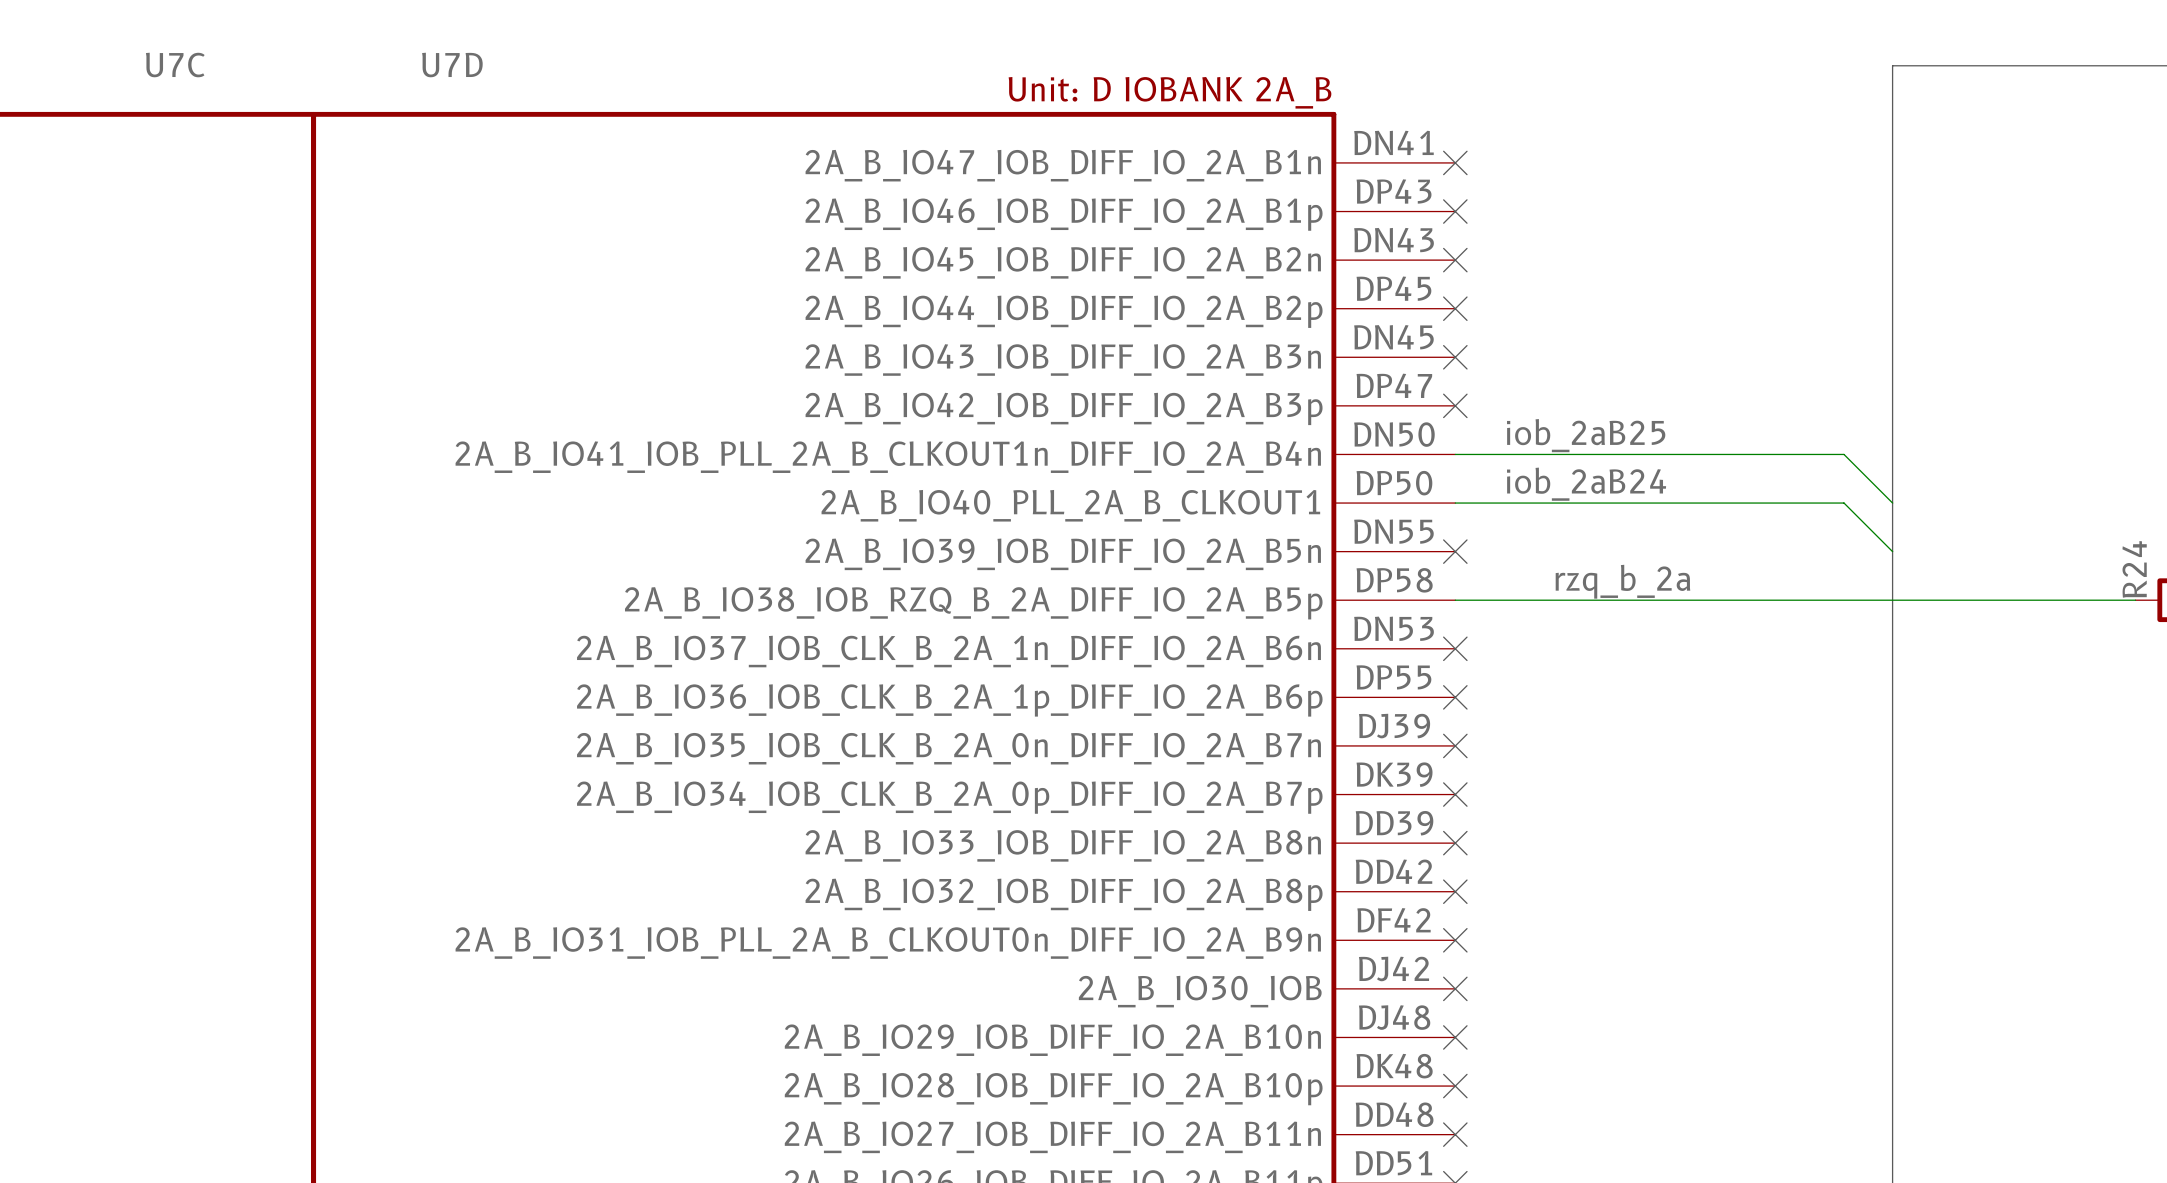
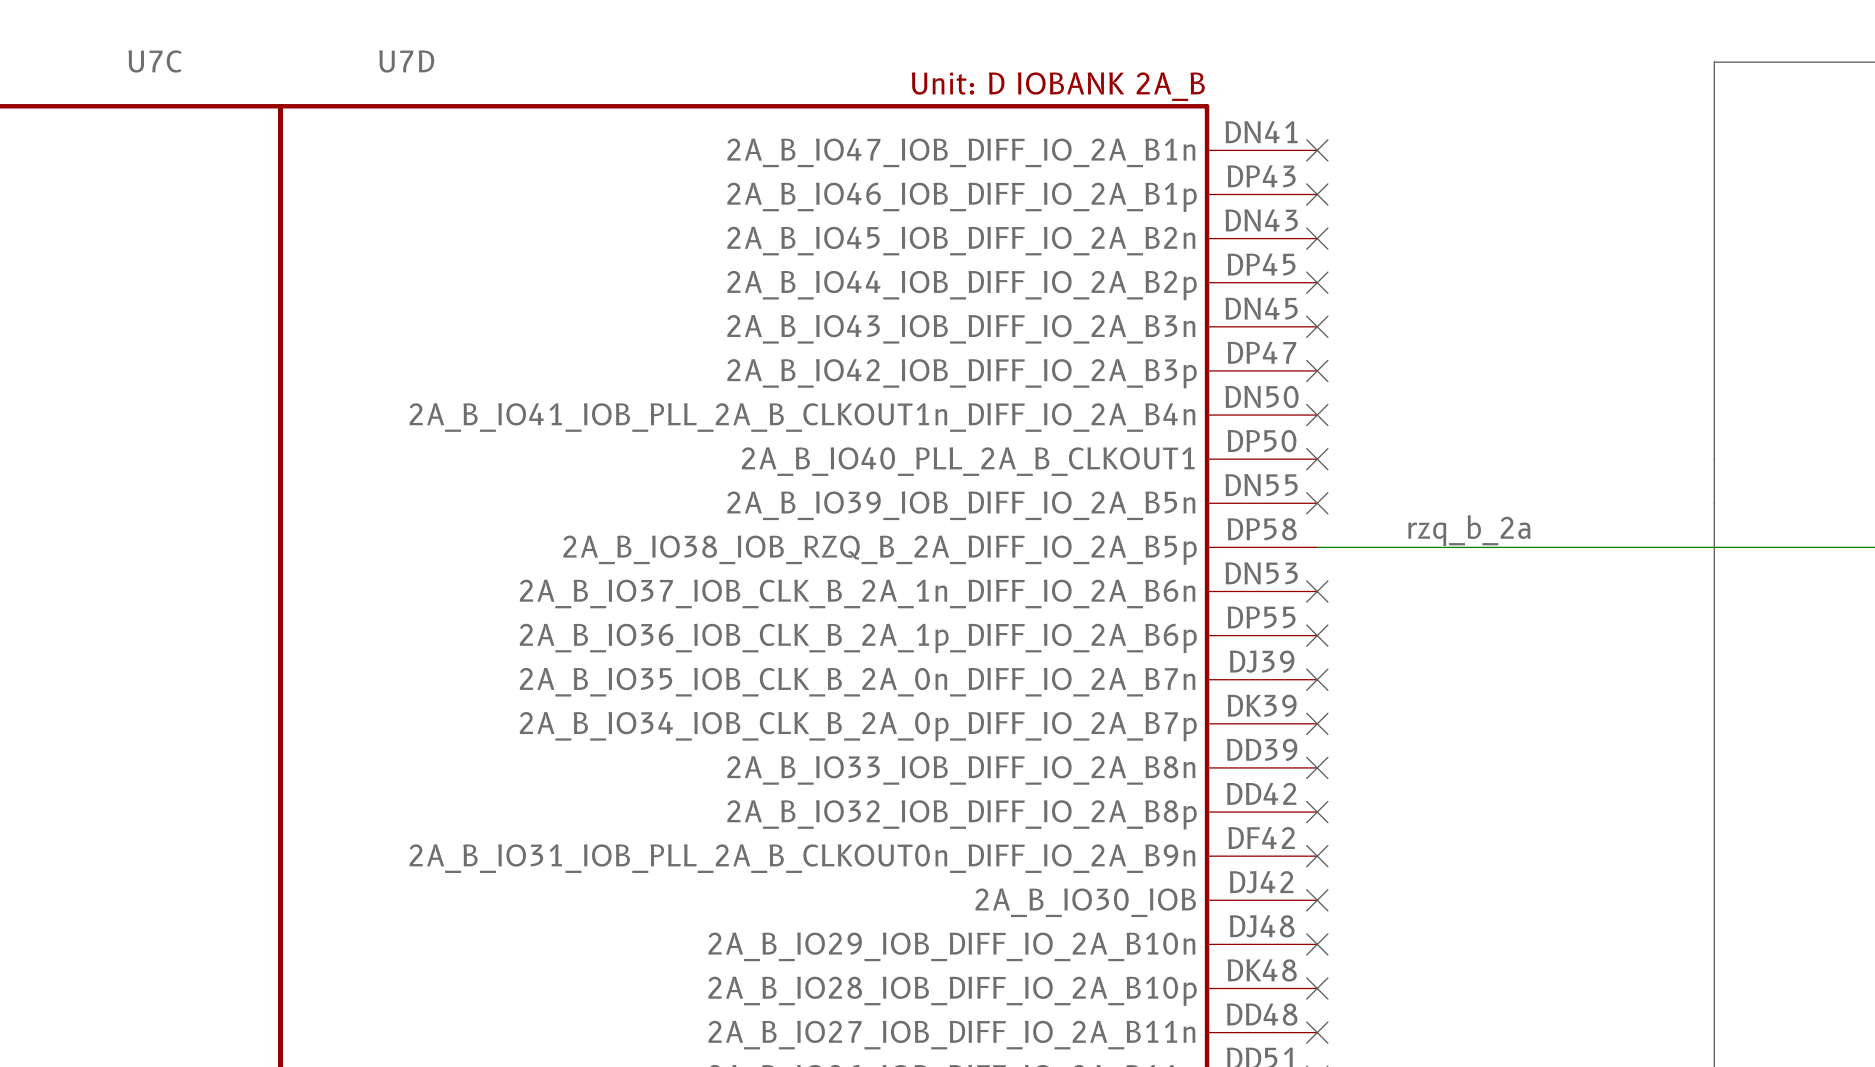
label: iob_2aB25 (1586, 435) -> none
wire: (1455, 454) (1844, 454) (1892, 503) -> none
no-connect mark: none -> (1317, 415)
label: iob_2aB24 (1586, 484) -> none
wire: (1455, 503) (1844, 503) (1892, 551) -> none
no-connect mark: none -> (1317, 459)

